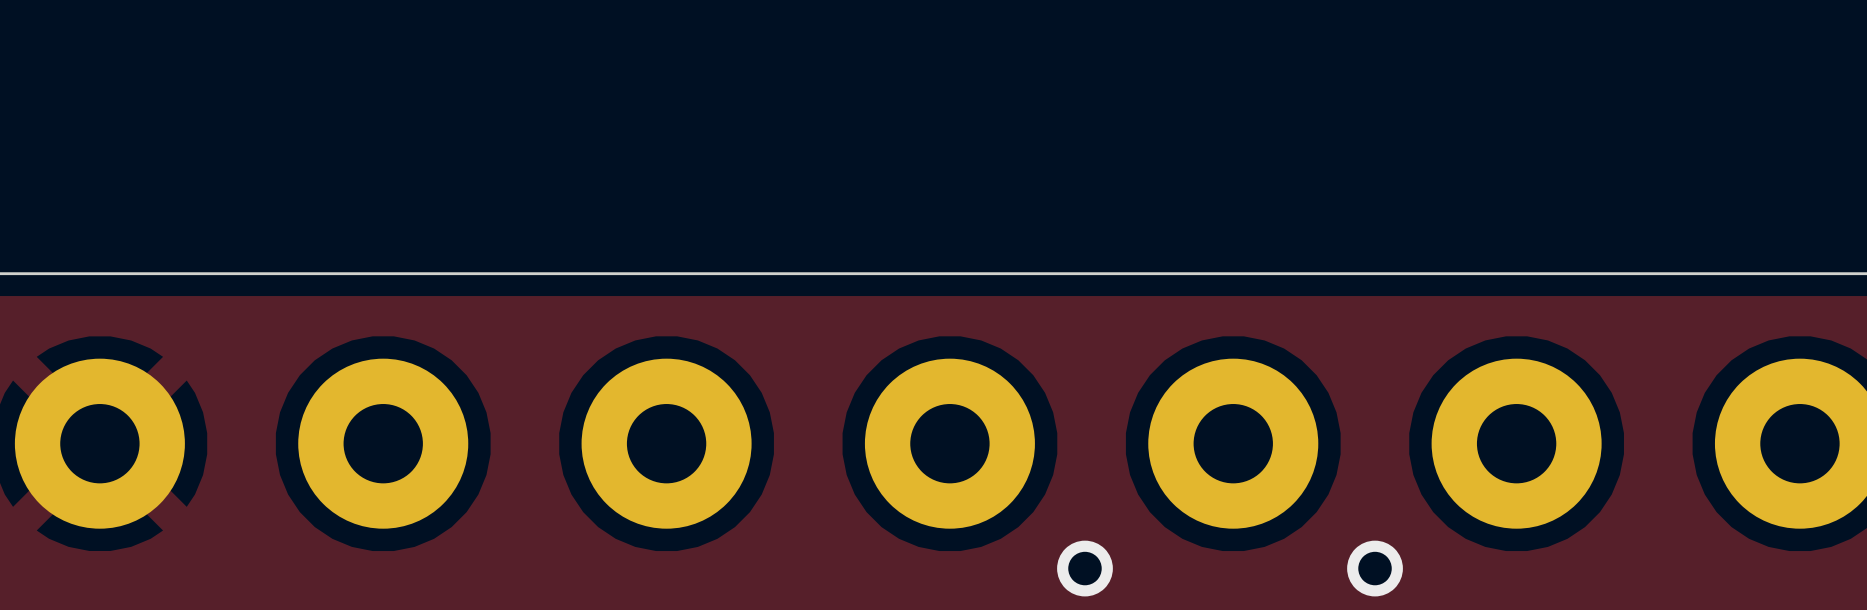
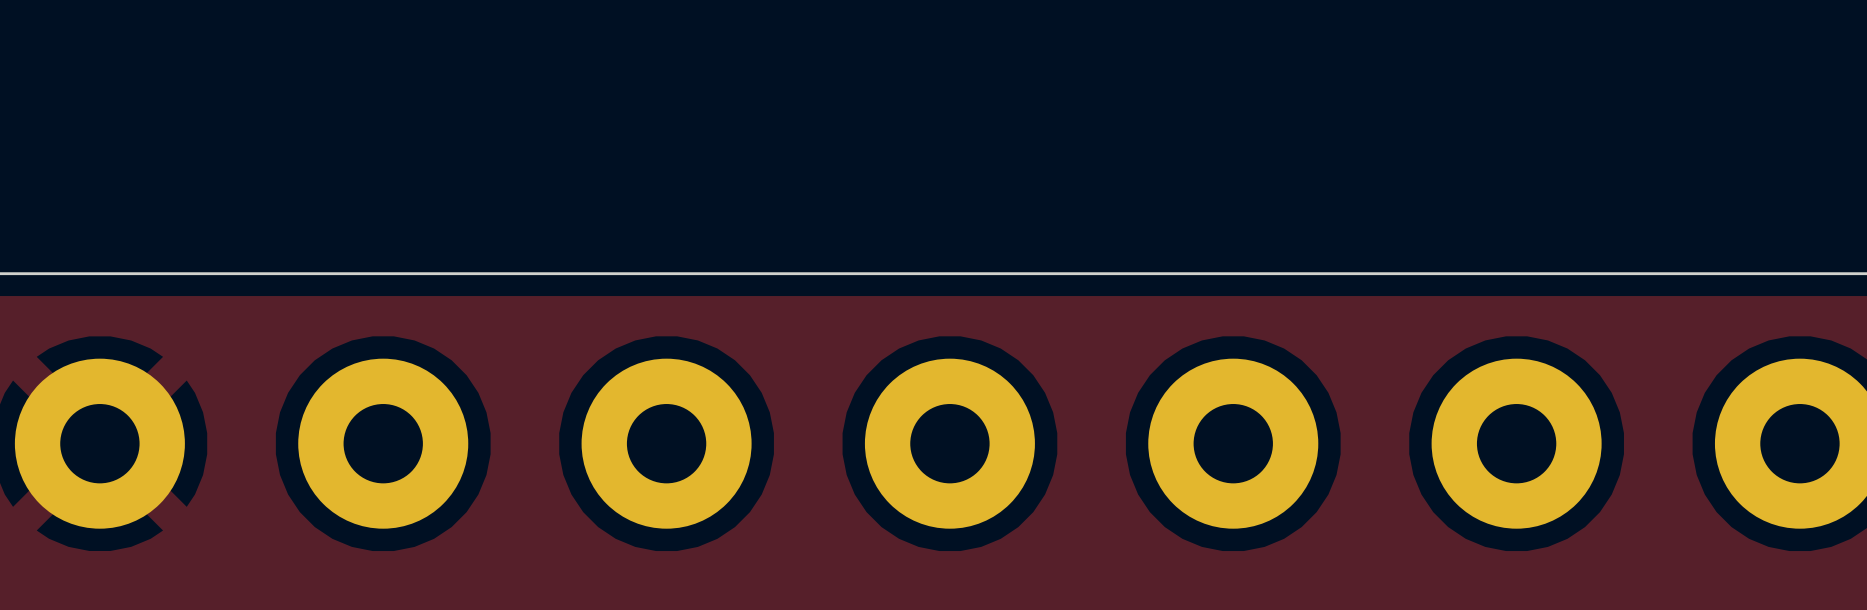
via: (1084, 568) -> none
via: (1375, 568) -> none

